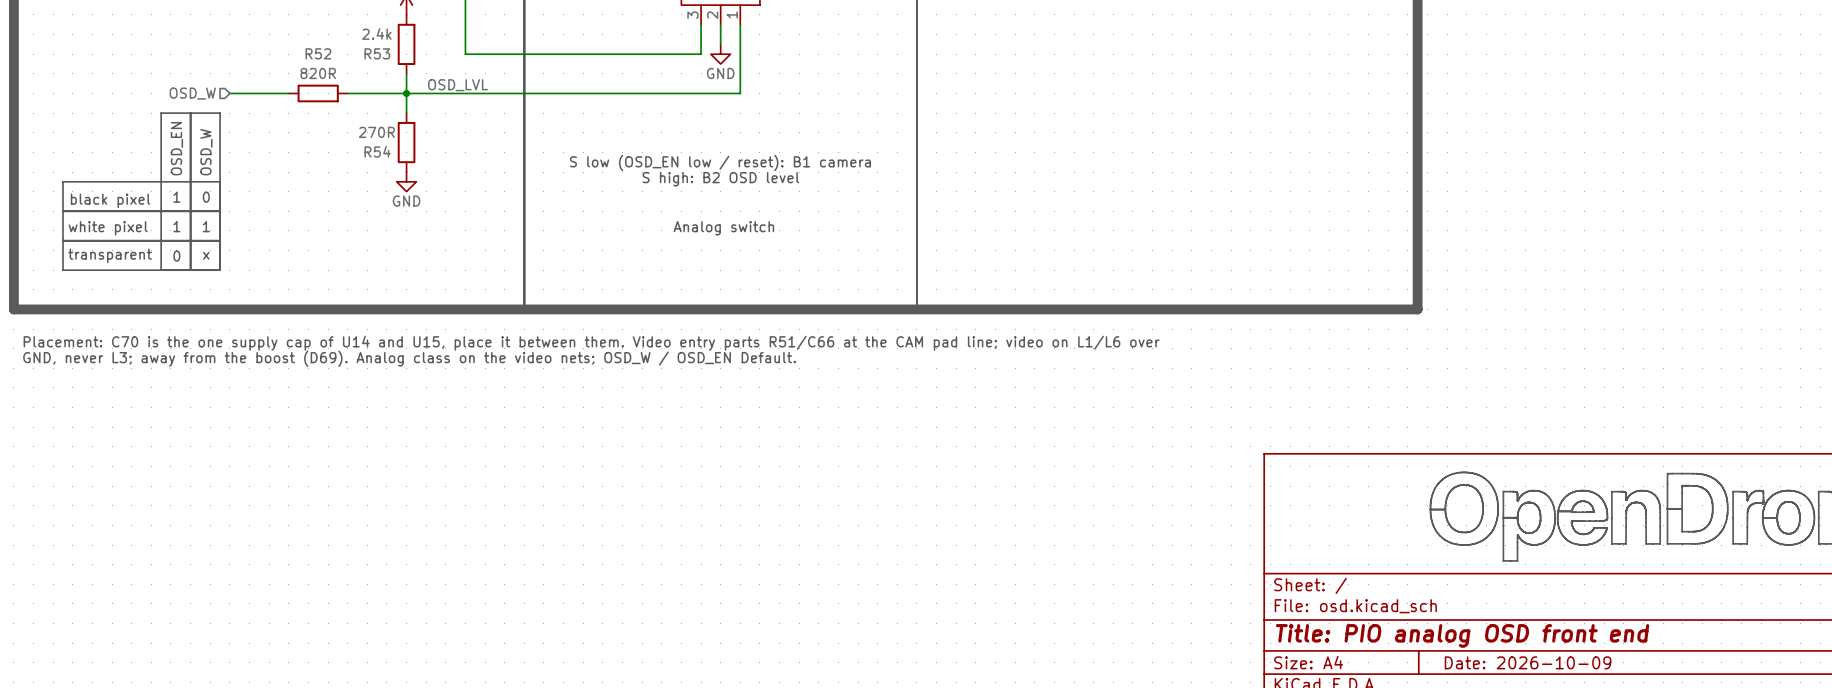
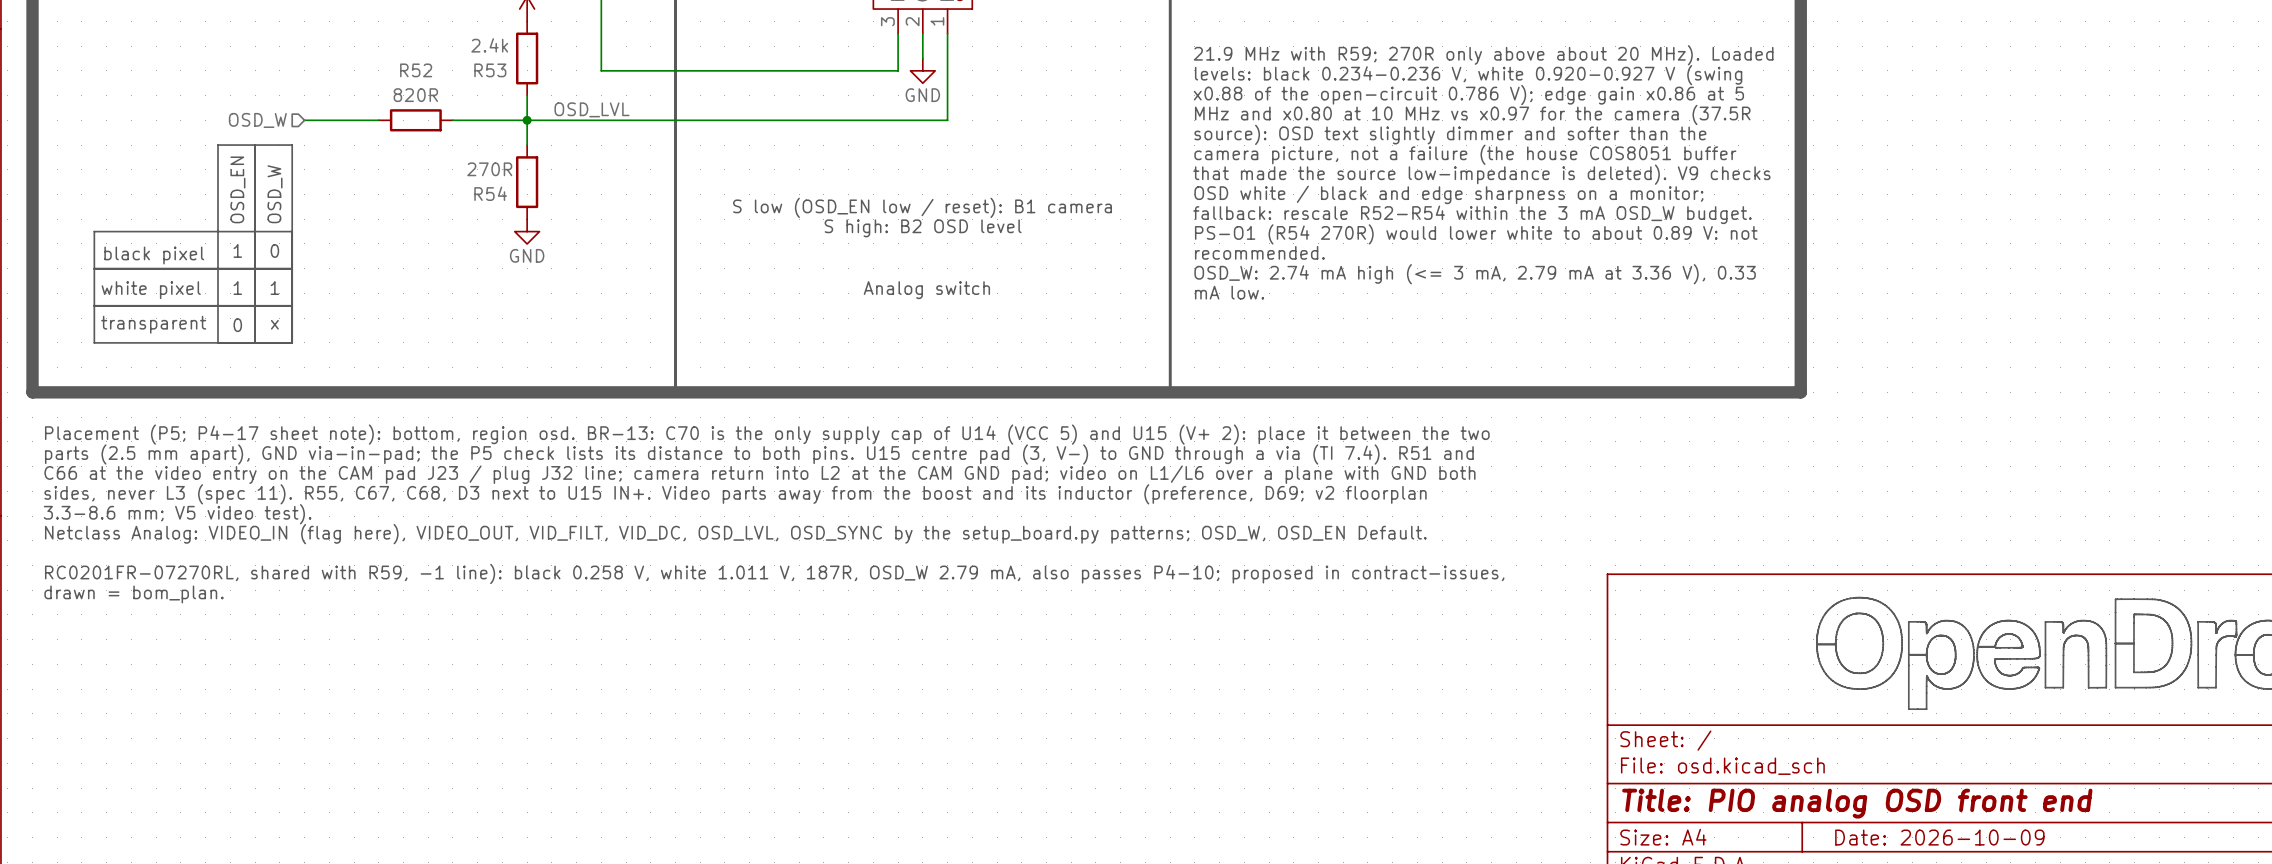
text: none -> 21.9 MHz with R59; 270R only above about 20 MHz). Loaded (1483, 55)
text: none -> levels: black 0.234-0.236 V, white 0.920-0.927 V (swing (1468, 75)
text: none -> x0.88 of the open-circuit 0.786 V); edge gain x0.86 at 5 (1468, 95)
text: none -> MHz and x0.80 at 10 MHz vs x0.97 for the camera (37.5R (1472, 114)
text: none -> source): OSD text slightly dimmer and softer than the (1450, 134)
text: none -> camera picture, not a failure (the house COS8051 buffer (1465, 154)
text: none -> that made the source low-impedance is deleted). V9 checks (1481, 174)
text: none -> OSD white / black and edge sharpness on a monitor; (1448, 194)
text: none -> fallback: rescale R52-R54 within the 3 mA OSD_W budget. (1472, 214)
text: none -> PS-O1 (R54 270R) would lower white to about 0.89 V: not (1476, 234)
text: none -> recommended. (1259, 252)
text: none -> OSD_W: 2.74 mA high (<= 3 mA, 2.79 mA at 3.36 V), 0.33 (1475, 274)
text: none -> mA low. (1229, 292)
text: Placement: C70 is the one supply cap of U14 and U15, place it between them. Video entry parts R51/C66 at the CAM pad line; video on L1/L6 over (591, 343) -> Placement (P5; P4-17 sheet note): bottom, region osd. BR-13: C70 is the only supply cap of U14 (VCC 5) and U15 (V+ 2): place it between the two (767, 434)
text: GND, never L3; away from the boost (D69). Analog class on the video nets; OSD_W / OSD_EN Default. (409, 358) -> parts (2.5 mm apart), GND via-in-pad; the P5 check lists its distance to both pins. U15 centre pad (3, V-) to GND through a via (TI 7.4). R51 and (759, 454)
text: none -> C66 at the video entry on the CAM pad J23 / plug J32 line; camera return into L2 at the CAM GND pad; video on L1/L6 over a plane with GND both (759, 474)
text: none -> sides, never L3 (spec 11). R55, C67, C68, D3 next to U15 IN+. Video parts away from the boost and its inductor (preference, D69; v2 floorplan (735, 494)
text: none -> 3.3-8.6 mm; V5 video test). (177, 514)
text: none -> Netclass Analog: VIDEO_IN (flag here), VIDEO_OUT, VID_FILT, VID_DC, OSD_LVL, OSD_SYNC by the setup_board.py patterns; OSD_W, OSD_EN Default. (735, 534)
text: none -> RC0201FR-07270RL, shared with R59, -1 line): black 0.258 V, white 1.011 V, 187R, OSD_W 2.79 mA, also passes P4-10; proposed in contract-issues, (774, 573)
text: none -> drawn = bom_plan. (134, 594)

